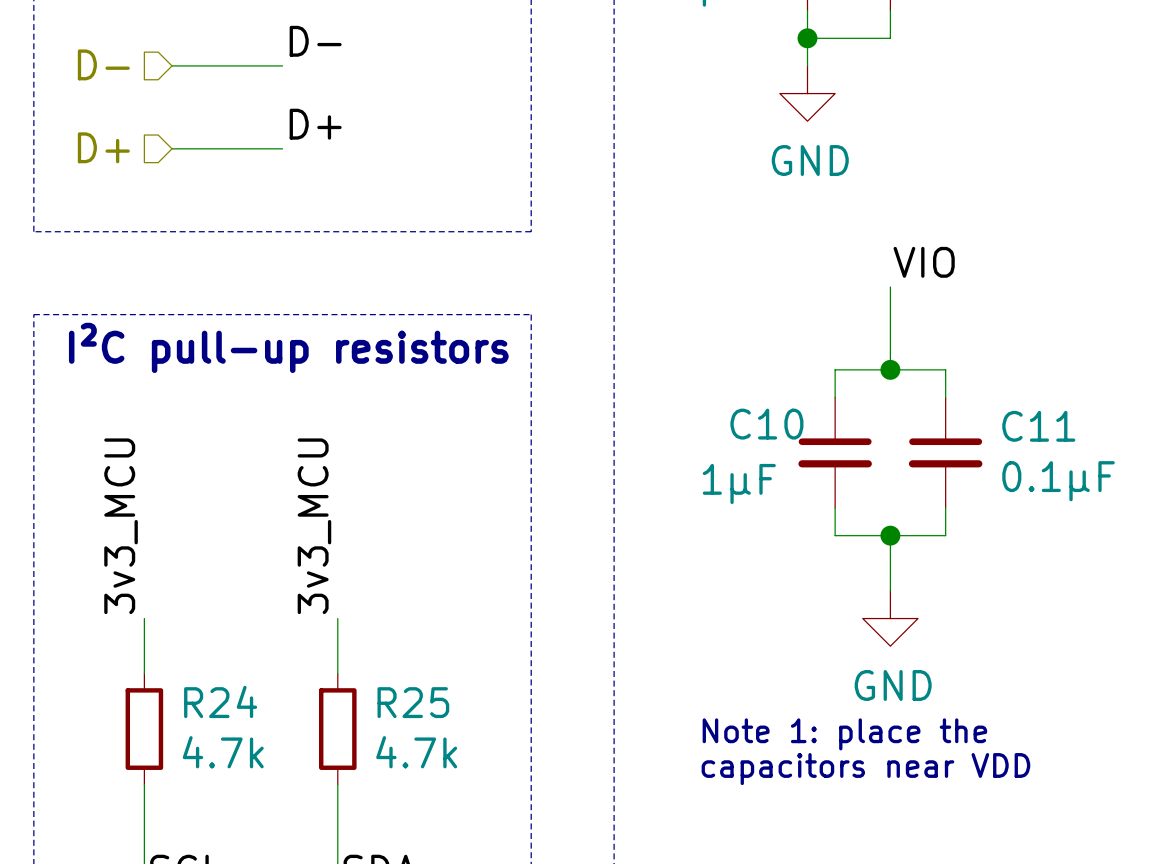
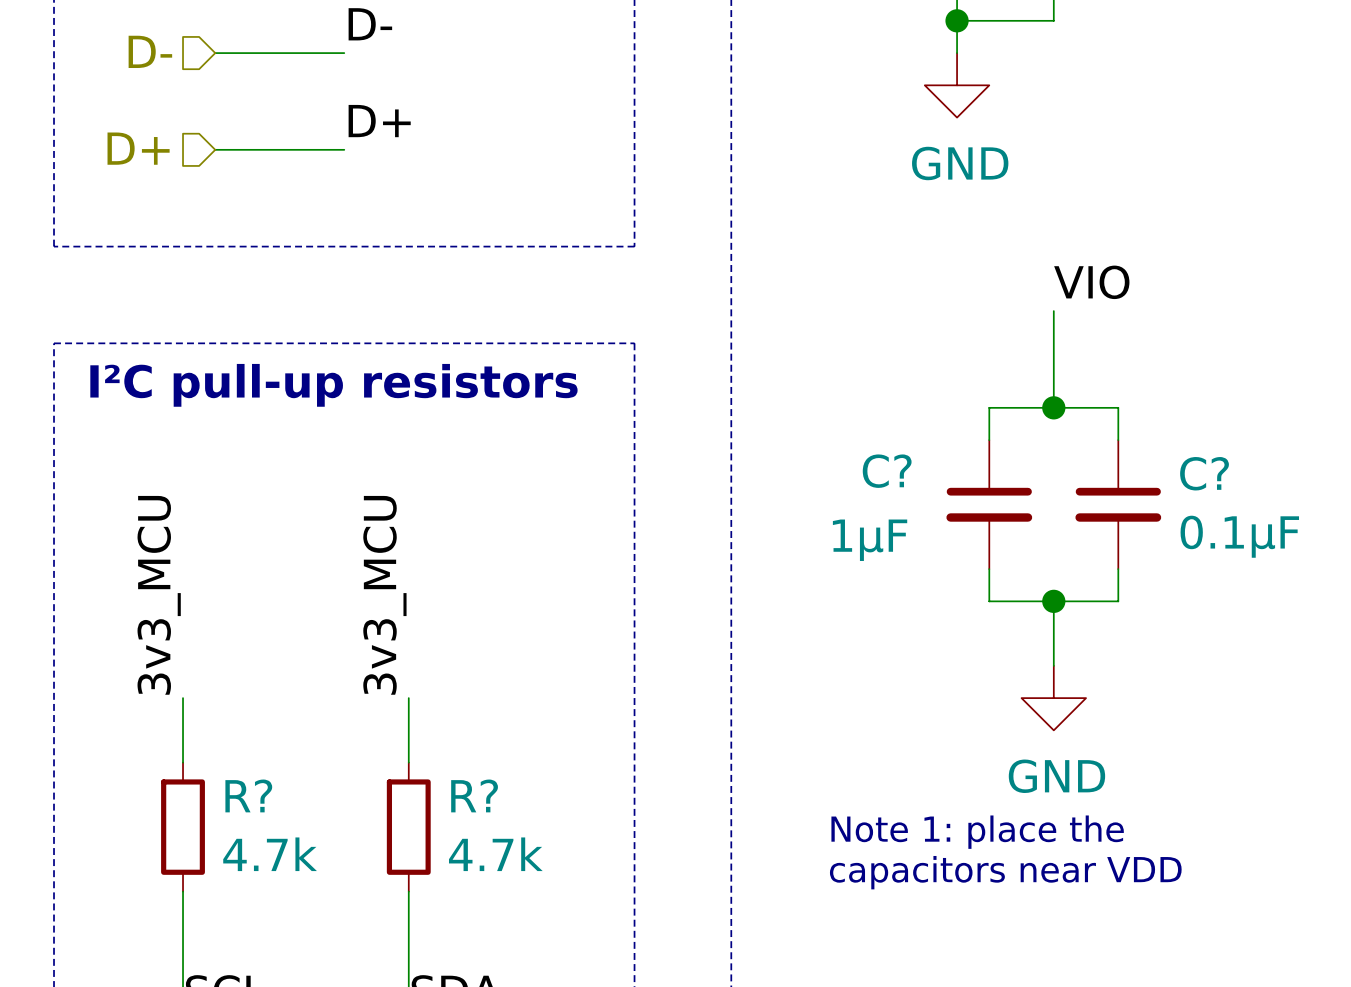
C10 name: C10 (766, 424) -> C? (887, 471)
C11 name: C11 (1038, 426) -> C? (1204, 473)
R24 name: R24 (220, 701) -> R? (248, 795)
R25 name: R25 (413, 702) -> R? (474, 795)

